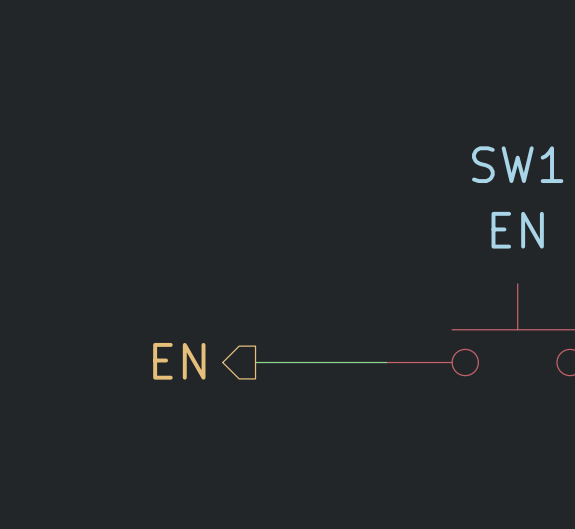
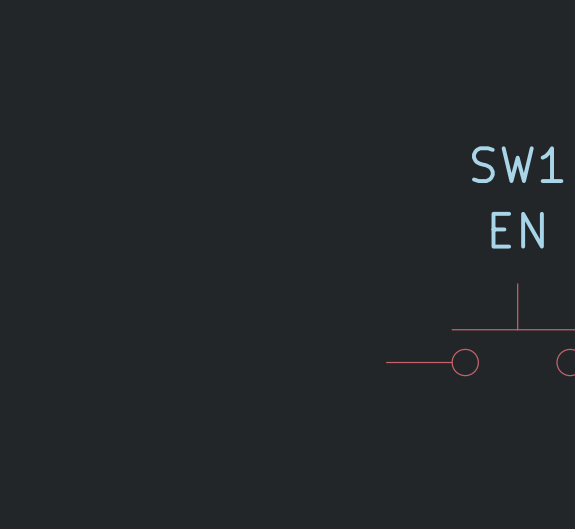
hierarchical label: EN (179, 361) -> none
wire: (255, 362) (386, 362) -> none

